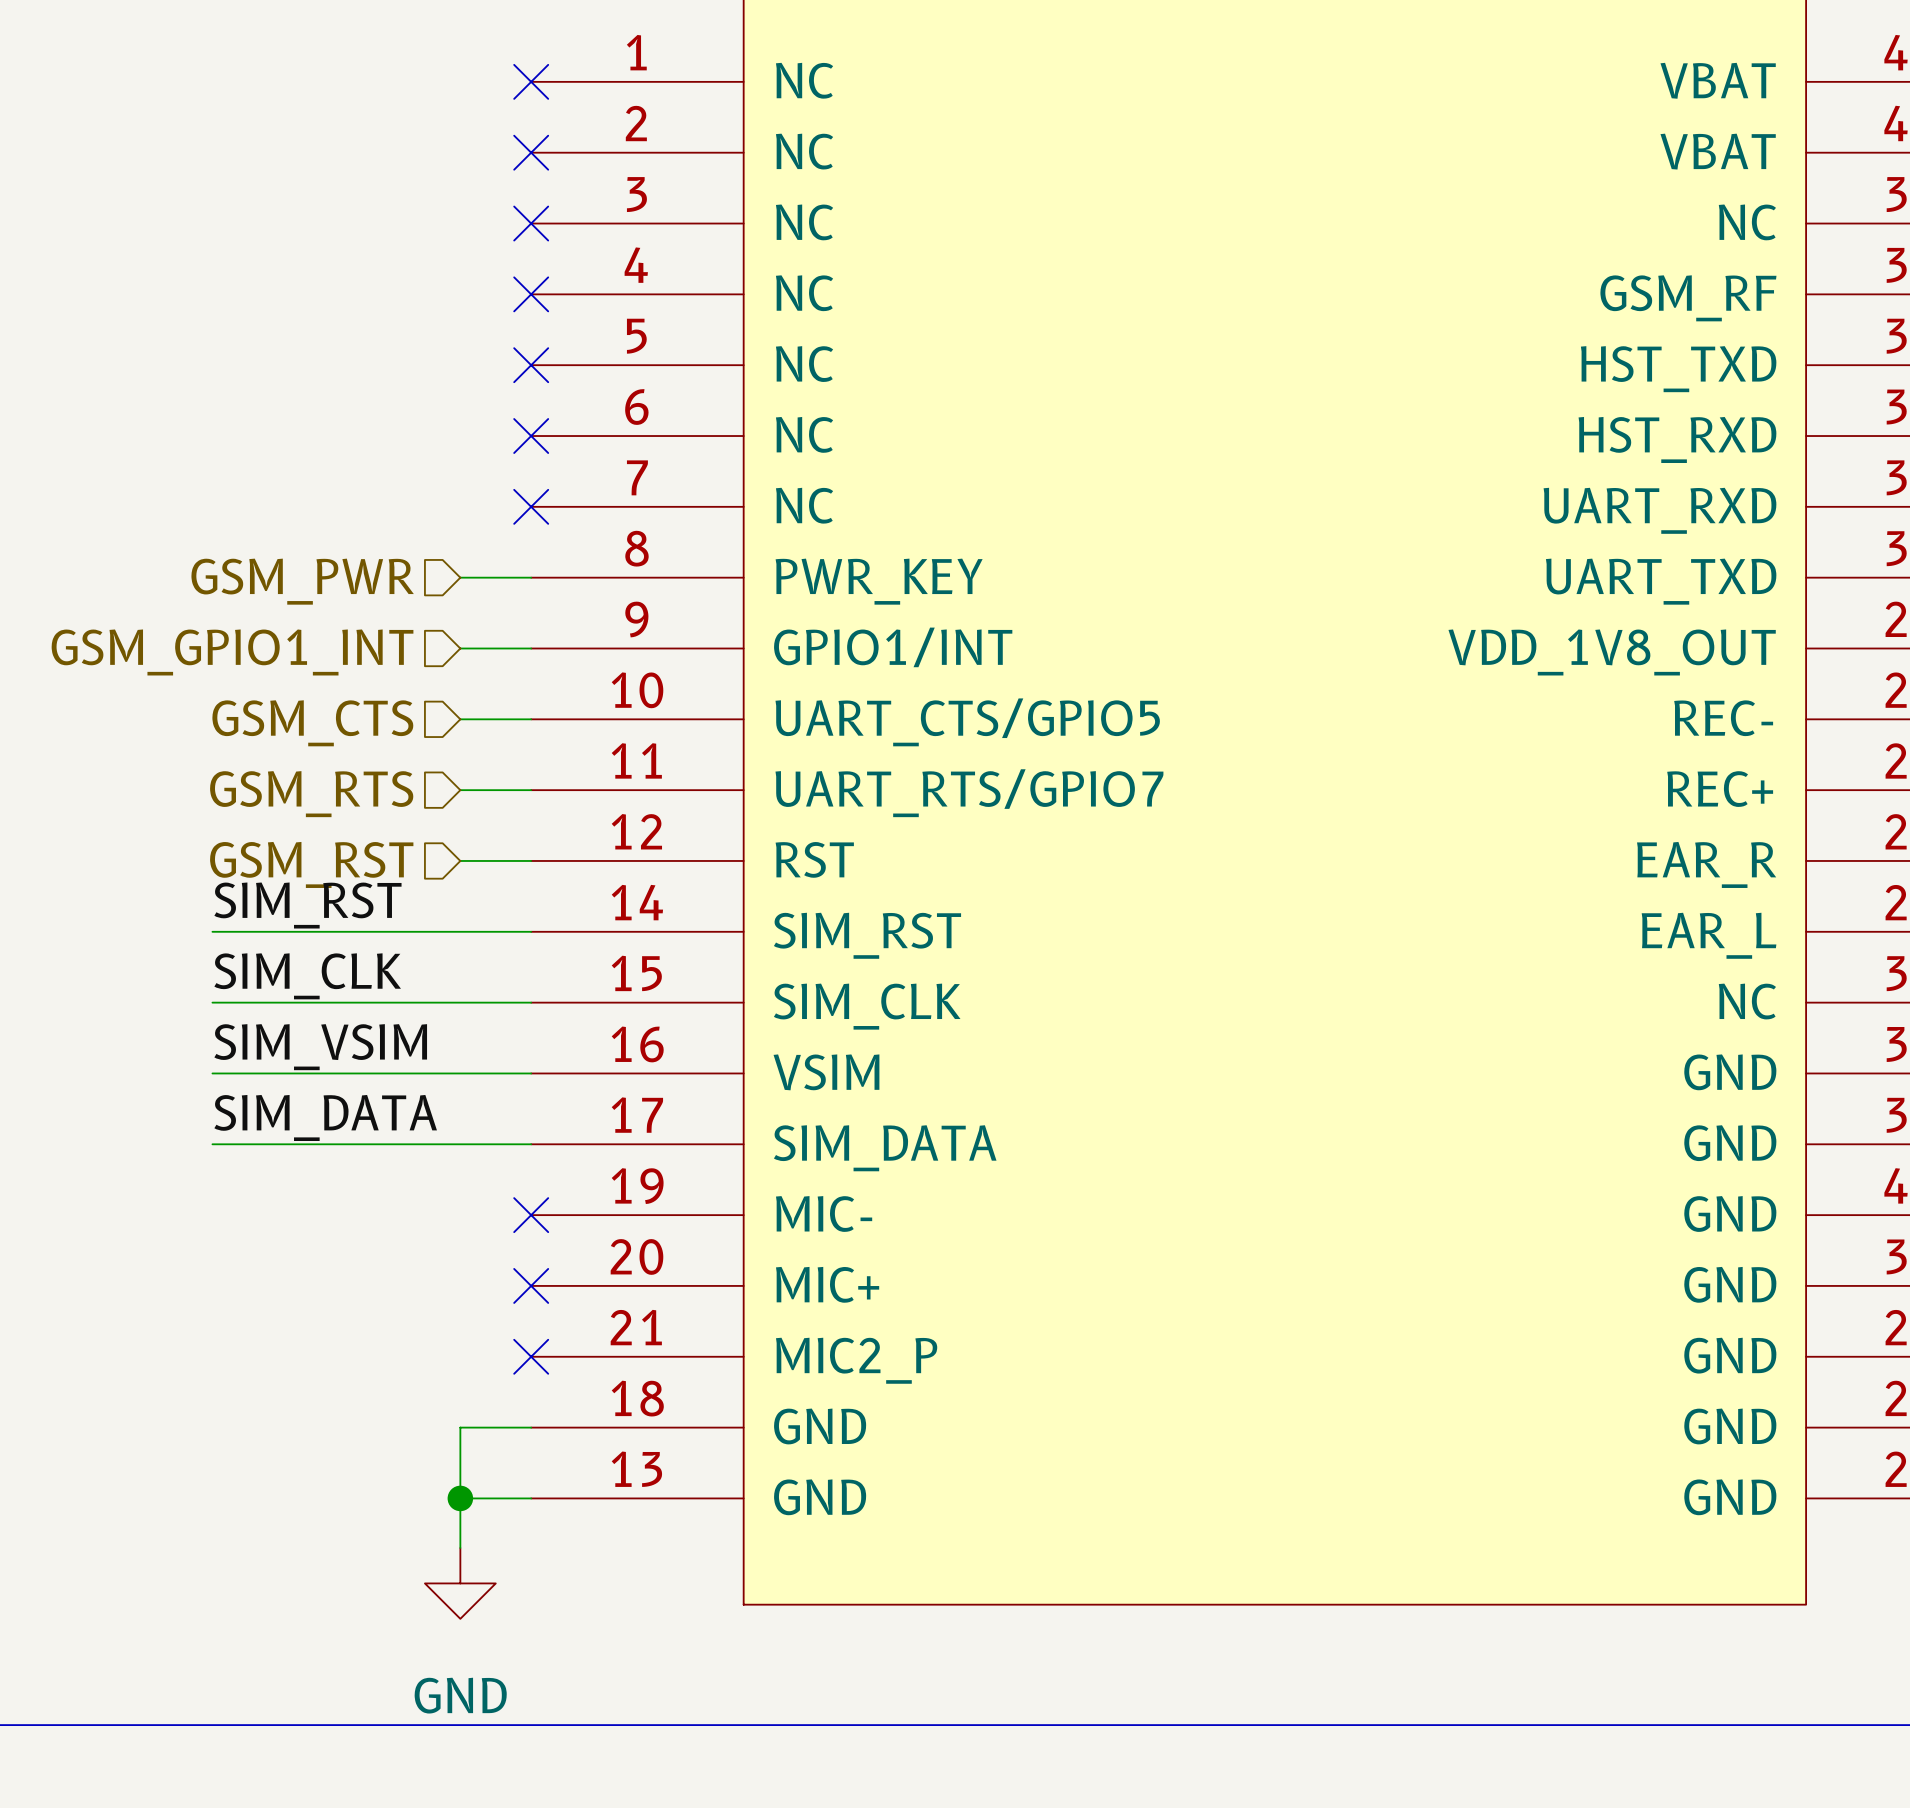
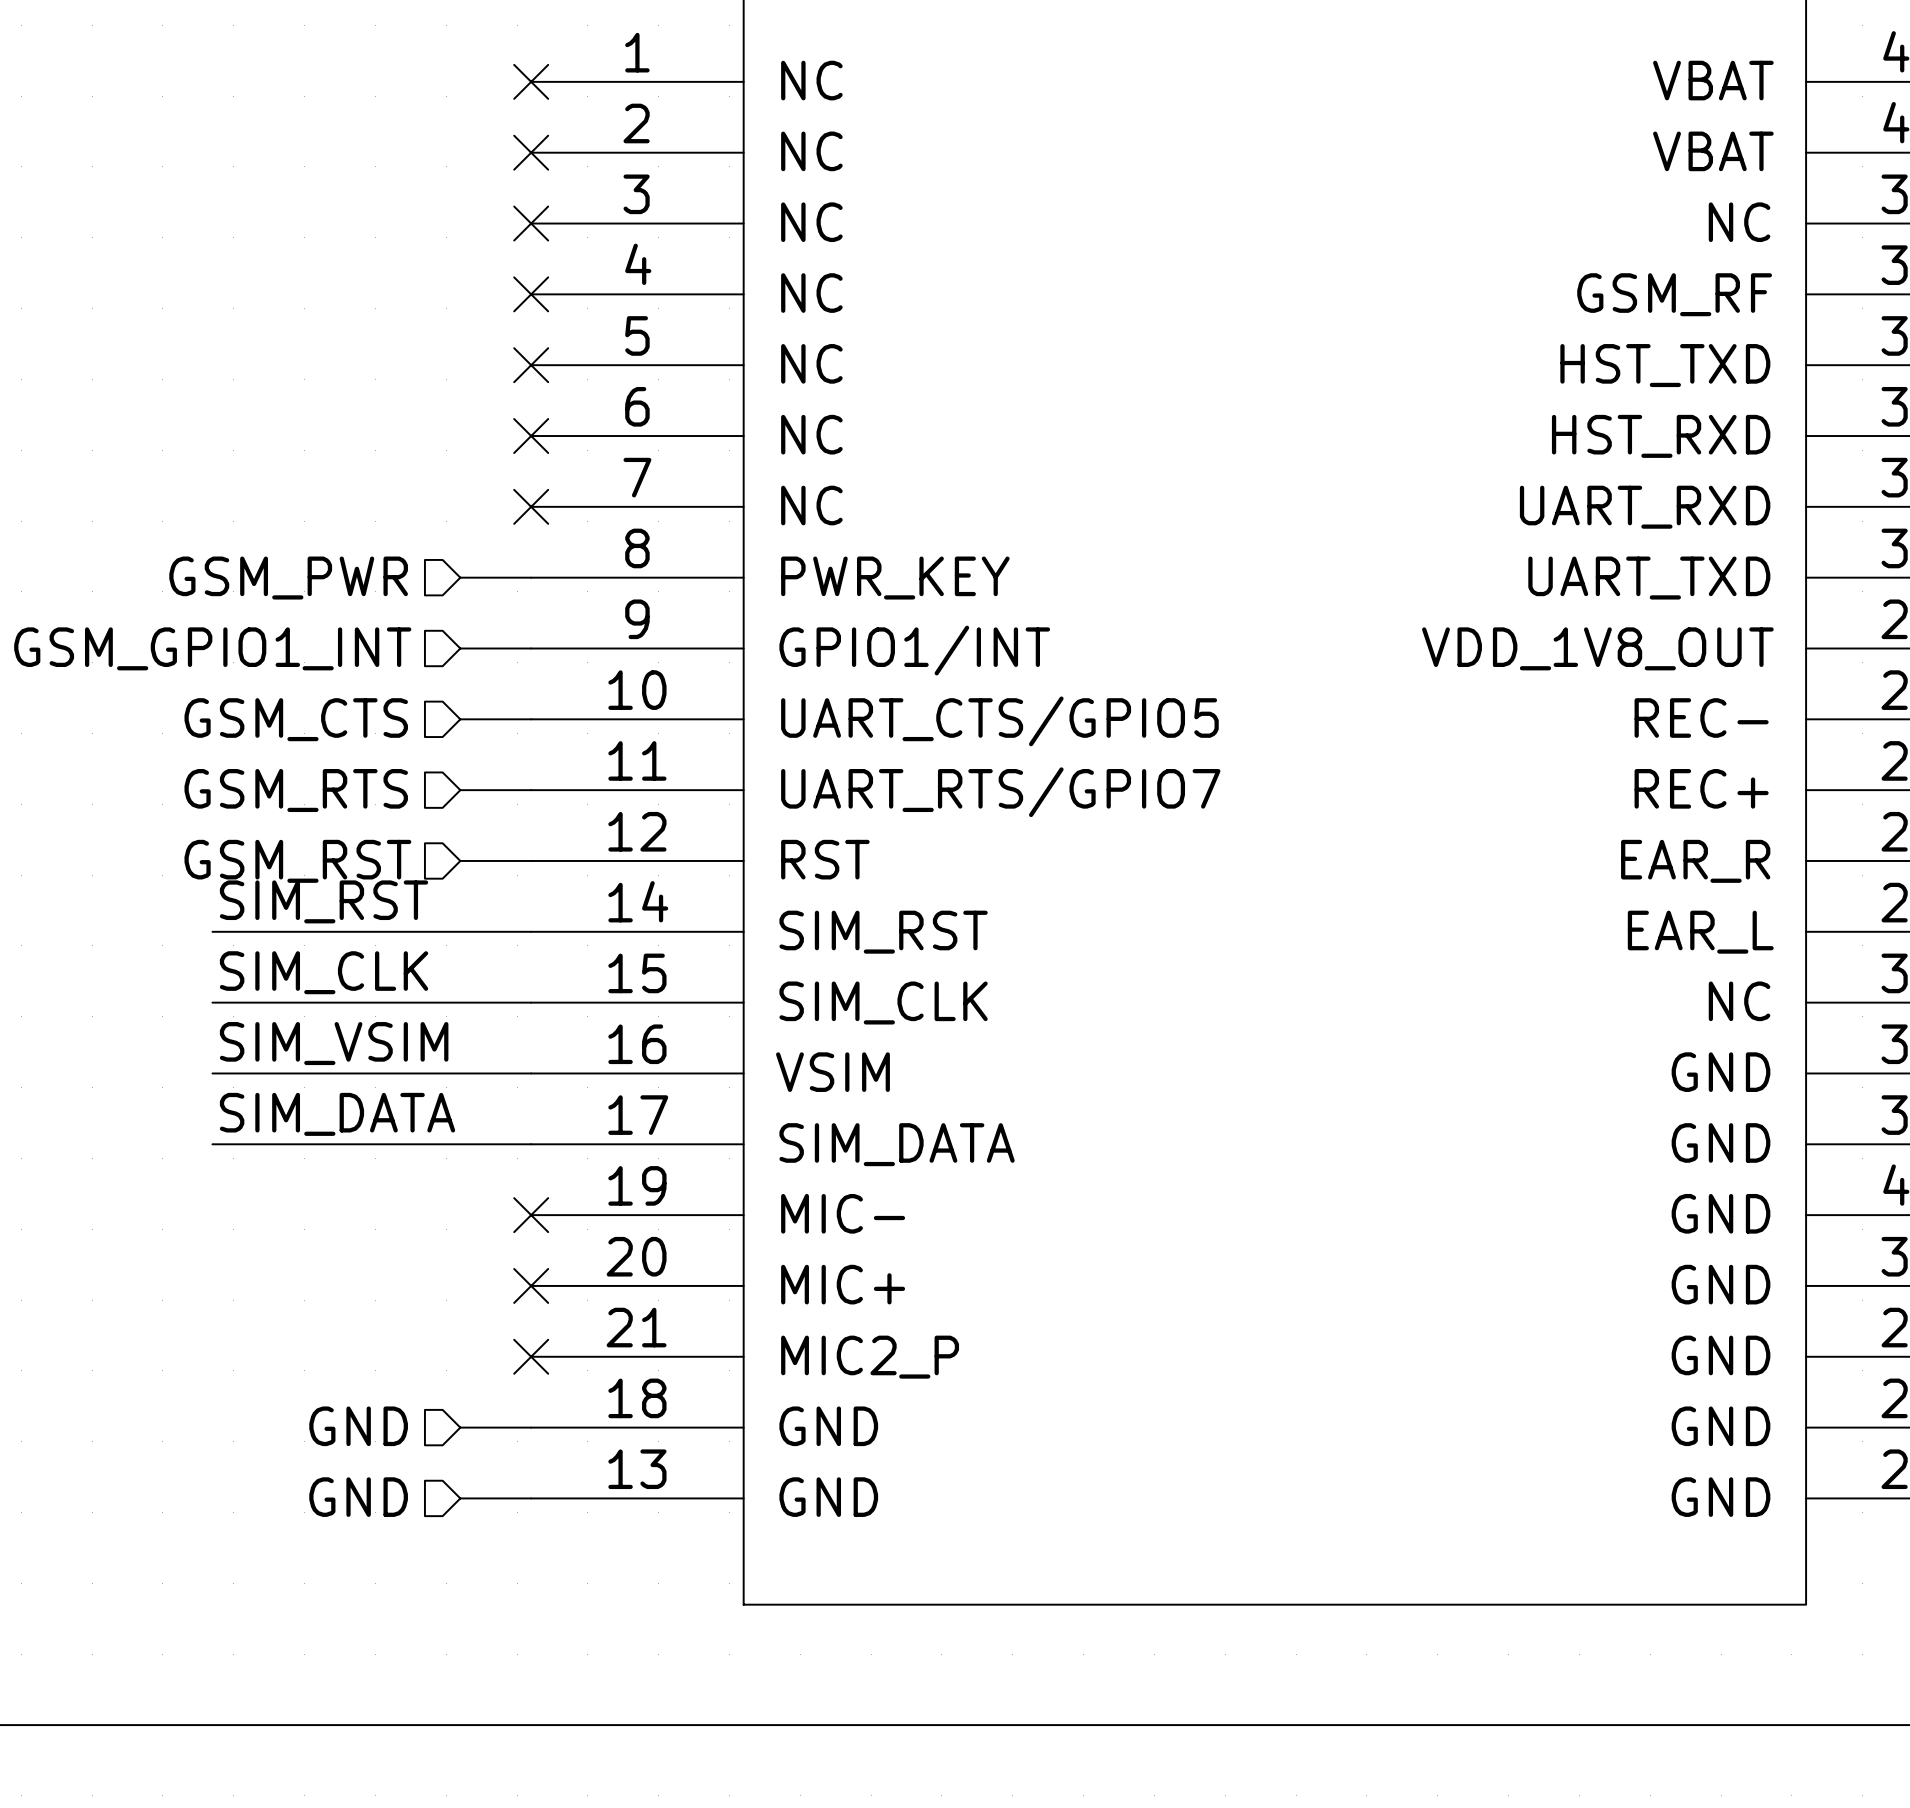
hierarchical label: none -> GND (358, 1426)
wire: (460, 1427) (460, 1548) -> none
hierarchical label: none -> GND (358, 1497)
junction: (460, 1498) -> none
power symbol: GND (460, 1583) -> none

